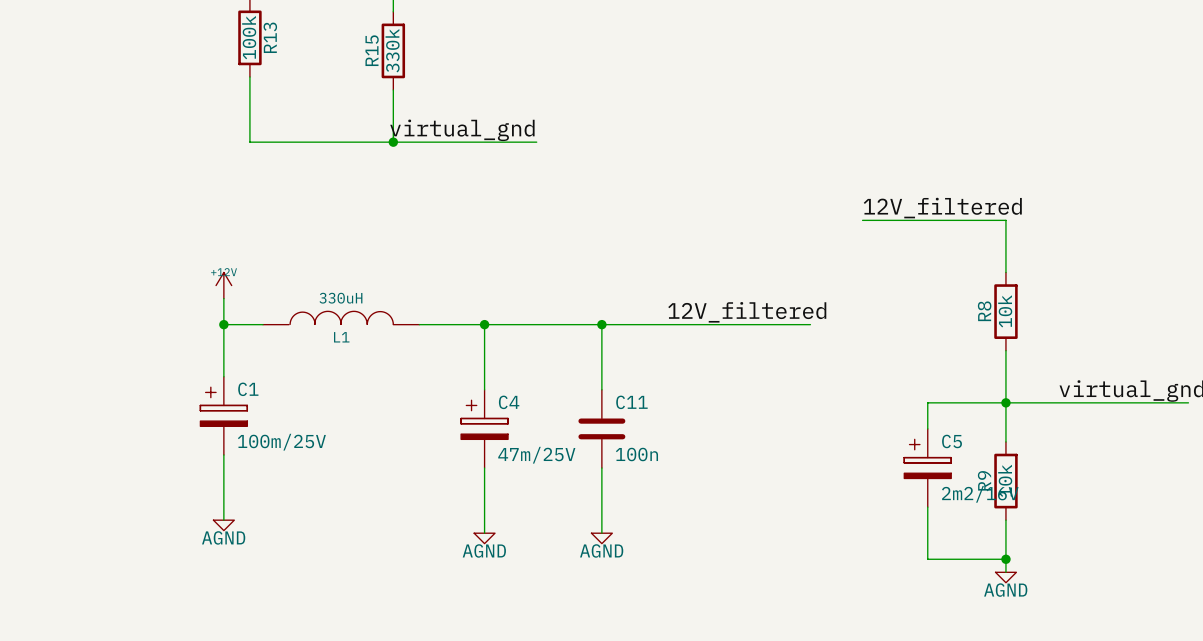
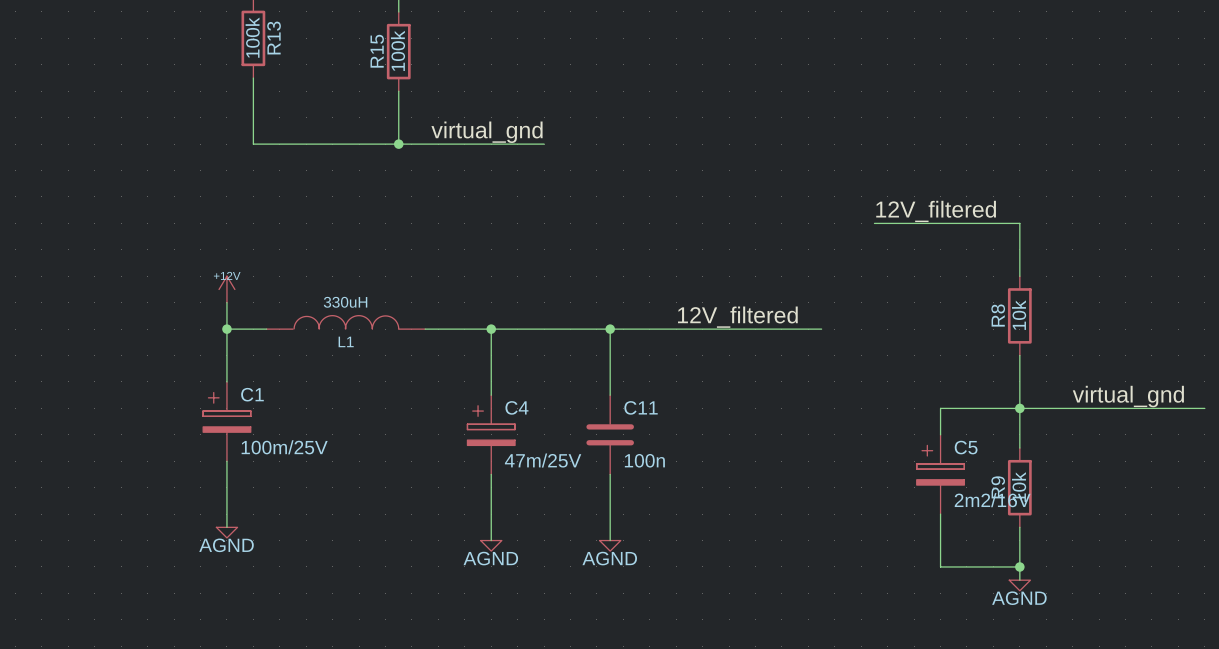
R15 value: 330k (392, 50) -> 100k (398, 50)

